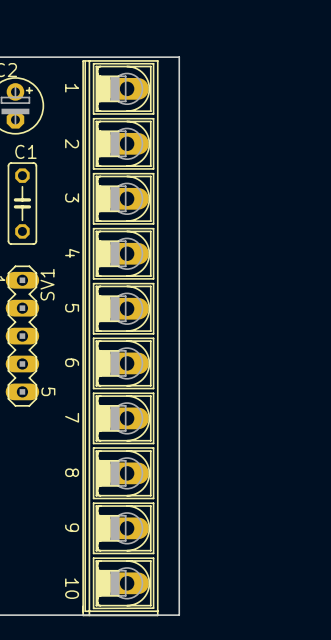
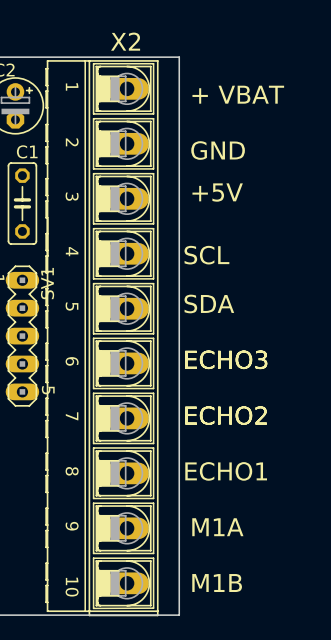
text: none -> + VBAT (238, 94)
text: none -> GND (218, 150)
text: none -> +5V (217, 192)
text: none -> SCL (206, 255)
text: none -> SDA (209, 303)
X2: none -> (101, 338)
part: (120, 338) -> none
text: none -> ECHO3 (226, 359)
text: none -> ECHO2 (226, 415)
text: none -> ECHO1 (226, 471)
text: none -> M1A (217, 527)
text: none -> M1B (217, 583)

